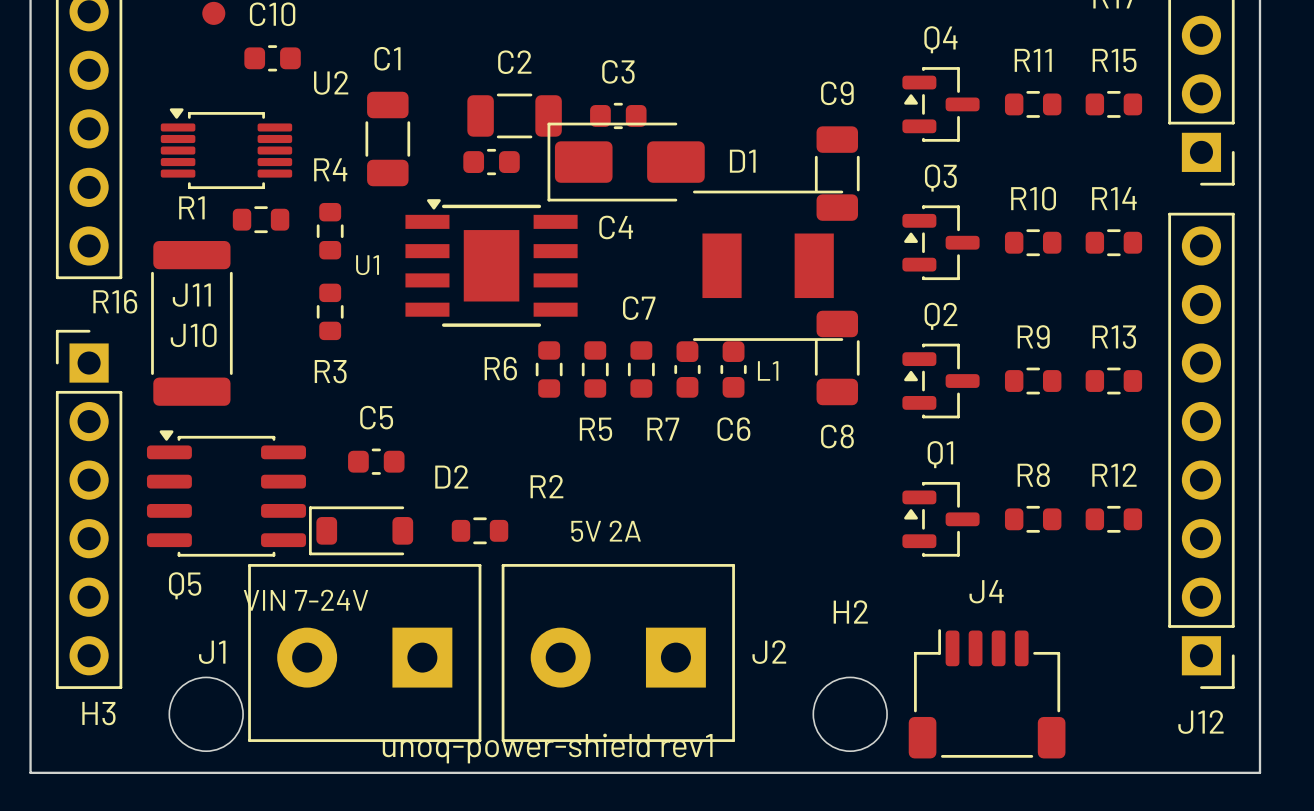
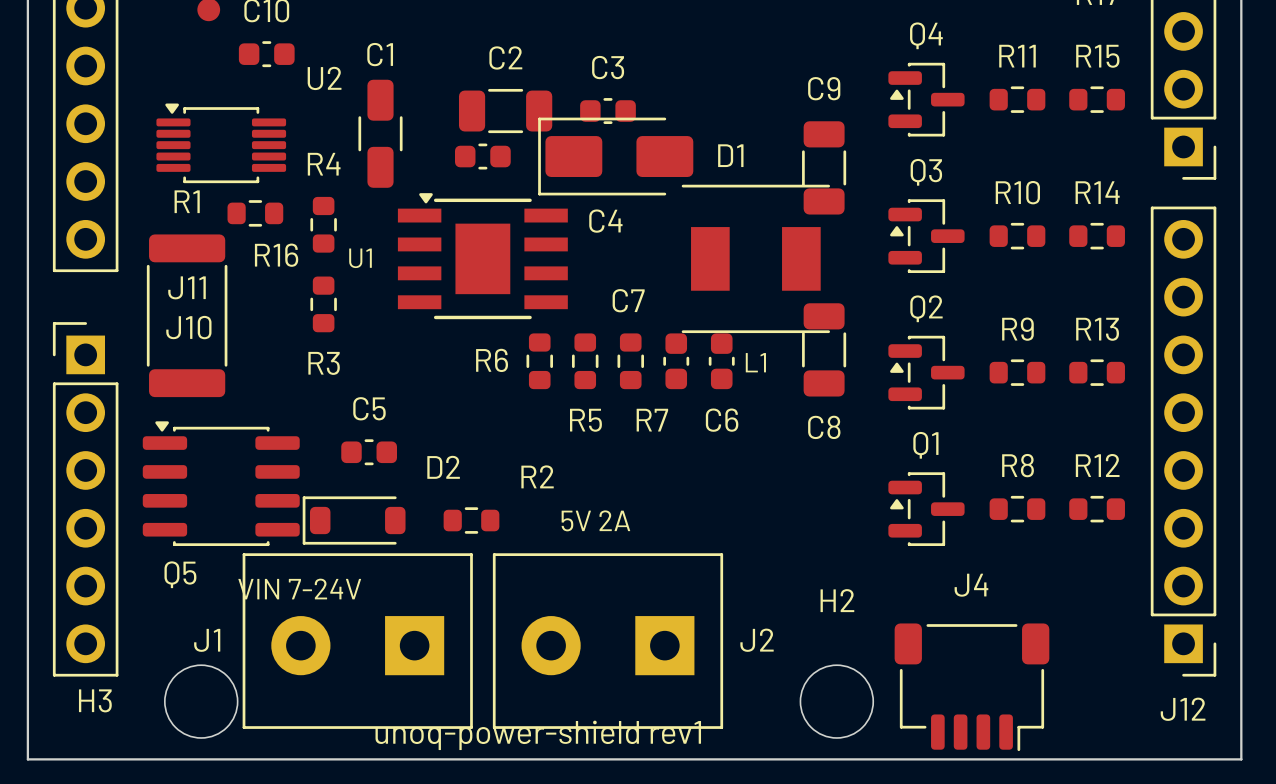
C1 footprint: [365, 91, 411, 187] -> [358, 79, 403, 188]
R16 name position: R16 (115, 301) -> R16 (276, 255)
J4 rotation: 0° (987, 693) -> 180° (971, 687)

